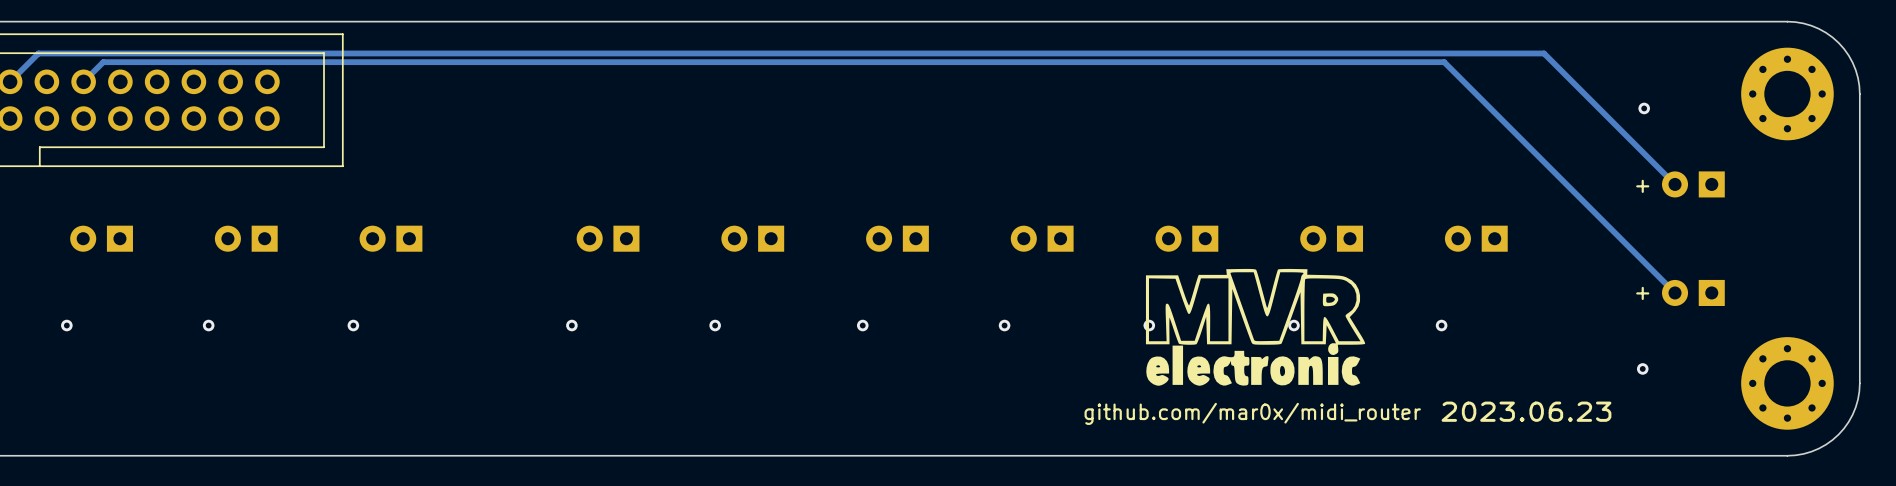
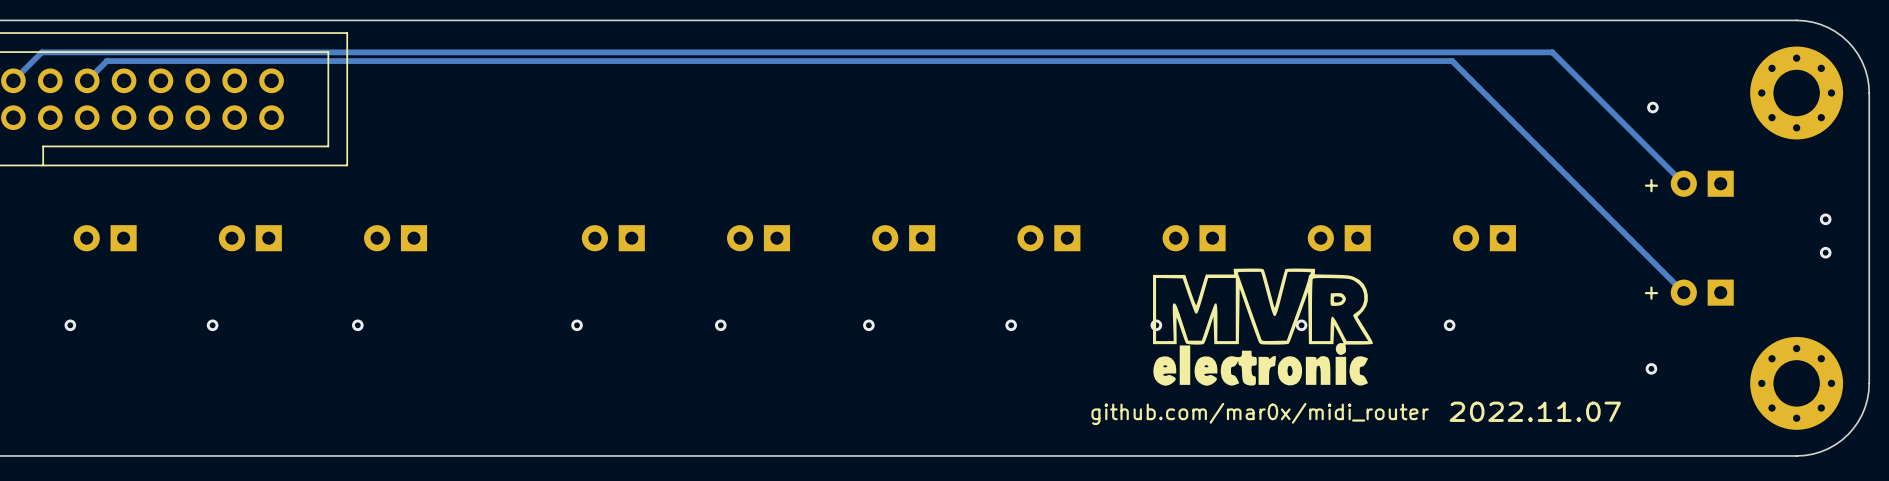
via: none -> (1825, 219)
via: none -> (1825, 252)
text: 2023.06.23 (1526, 411) -> 2022.11.07 (1535, 411)

